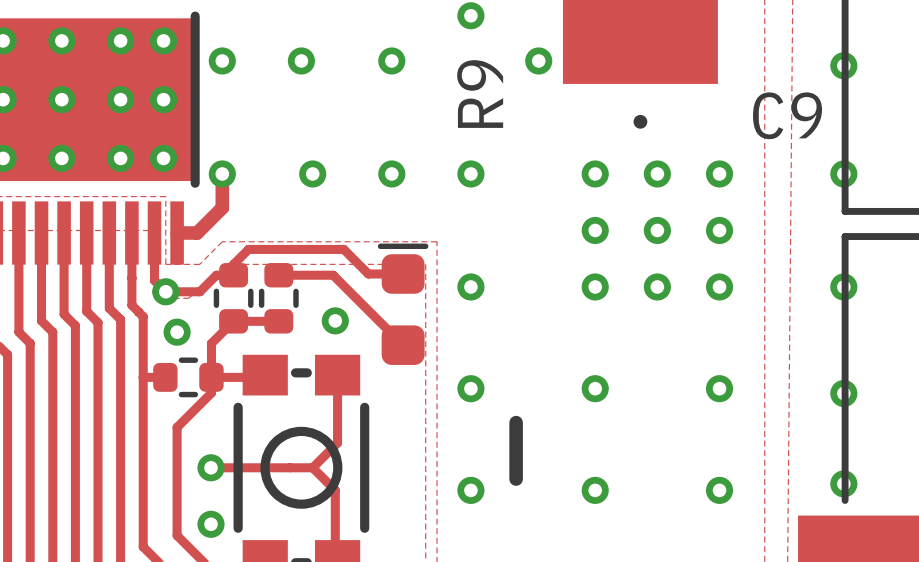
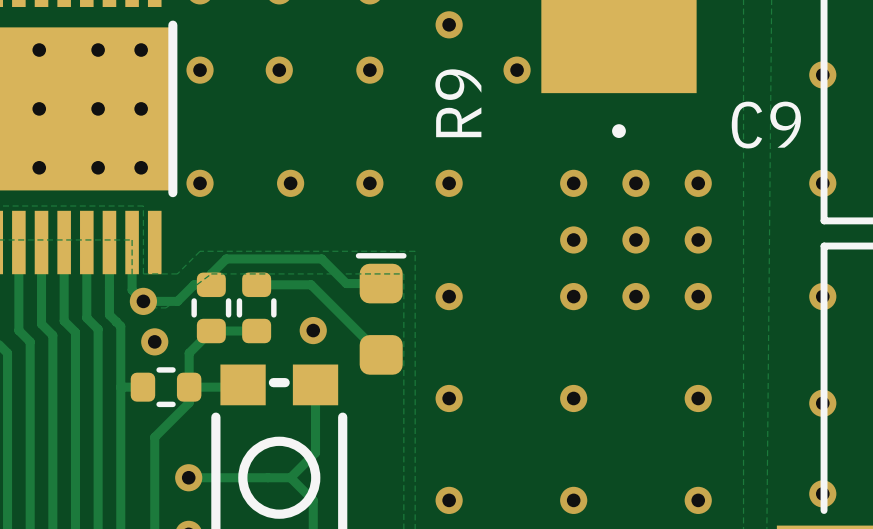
track: (222, 173) (222, 207) (197, 233) (177, 233) -> none
line: (516, 422) (516, 479) -> none

